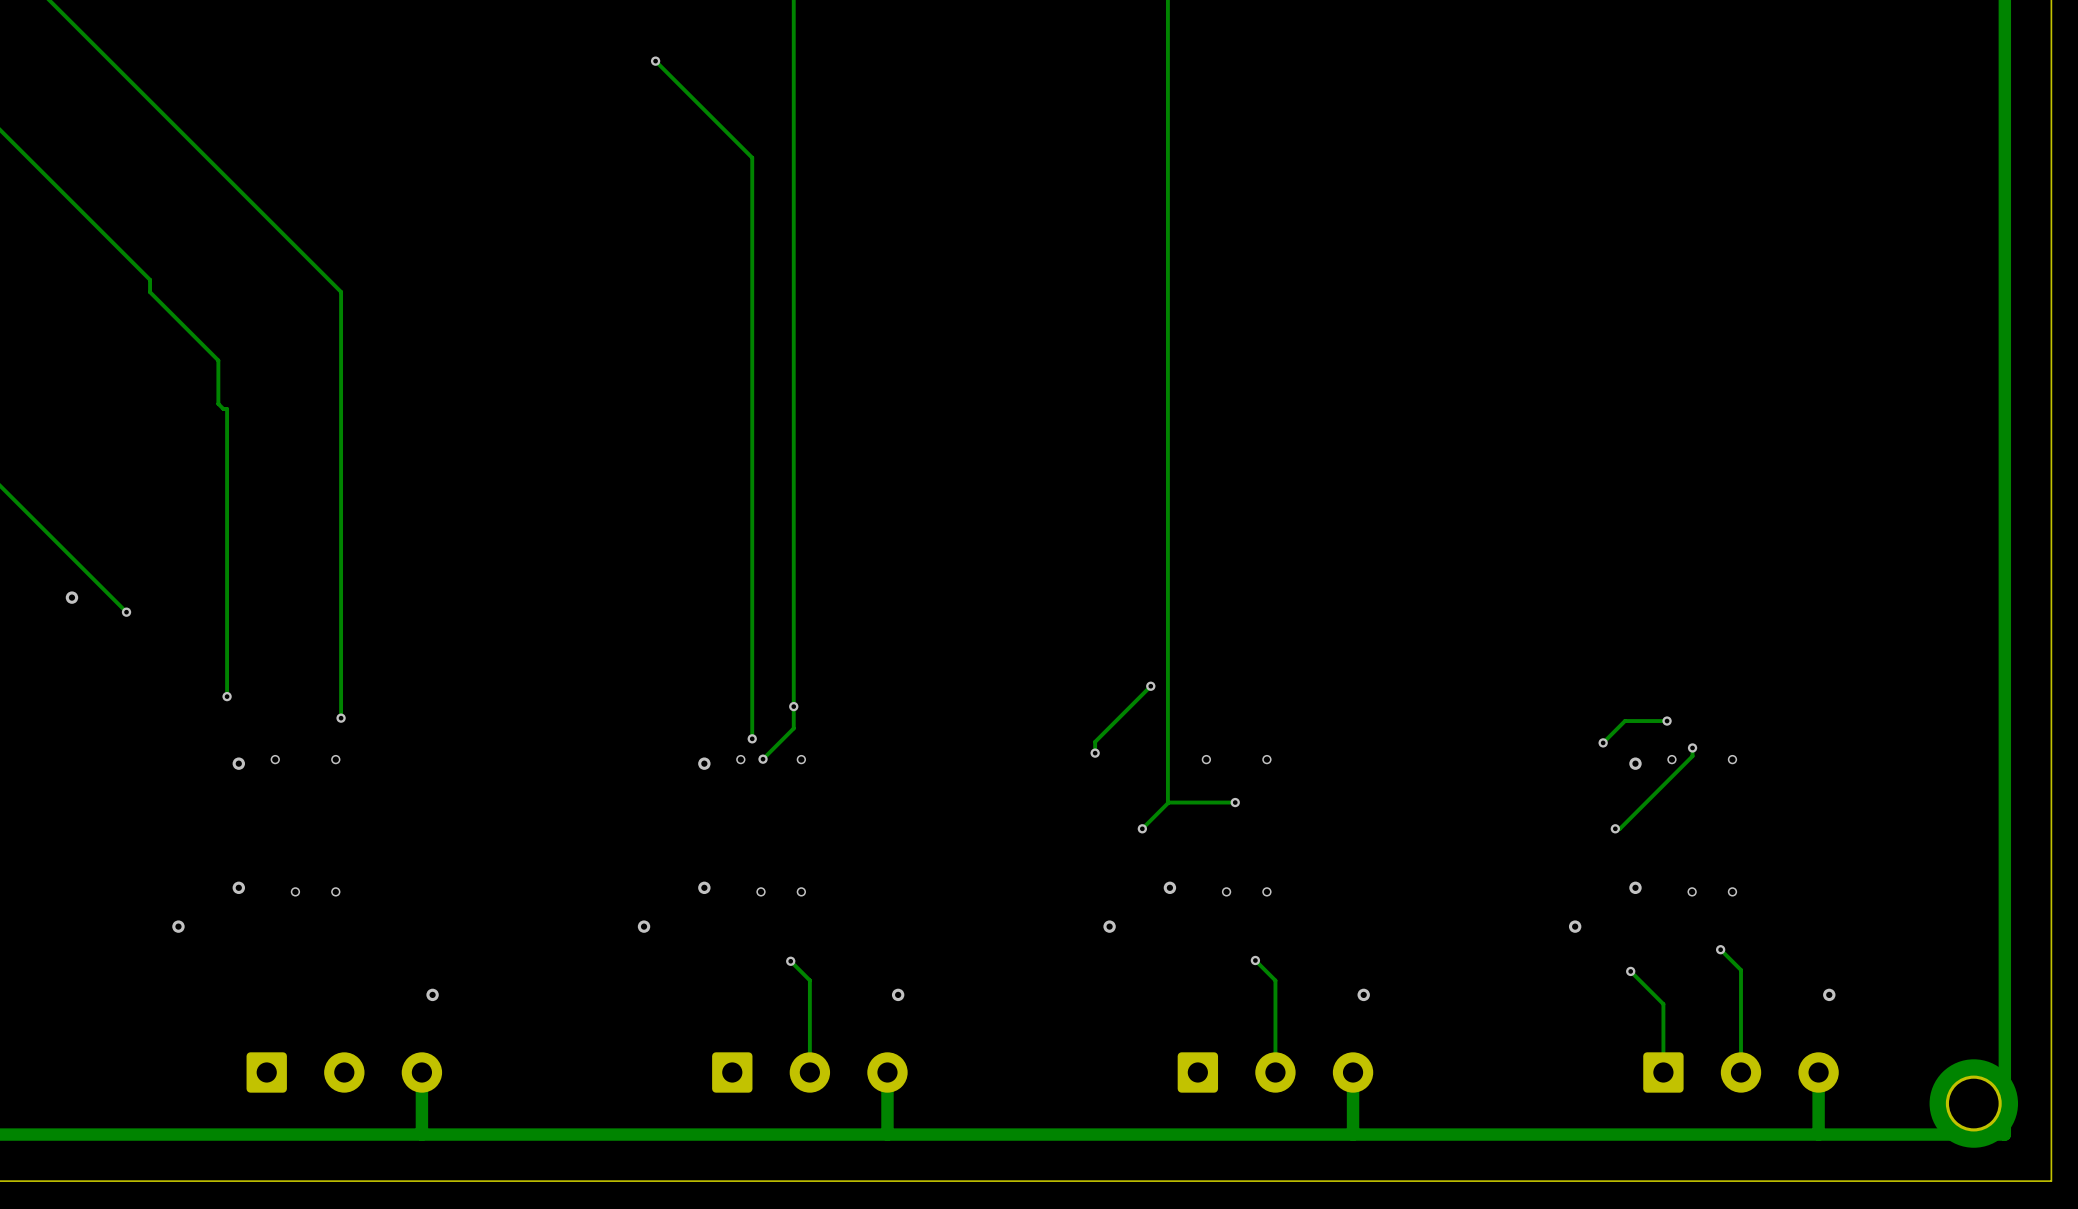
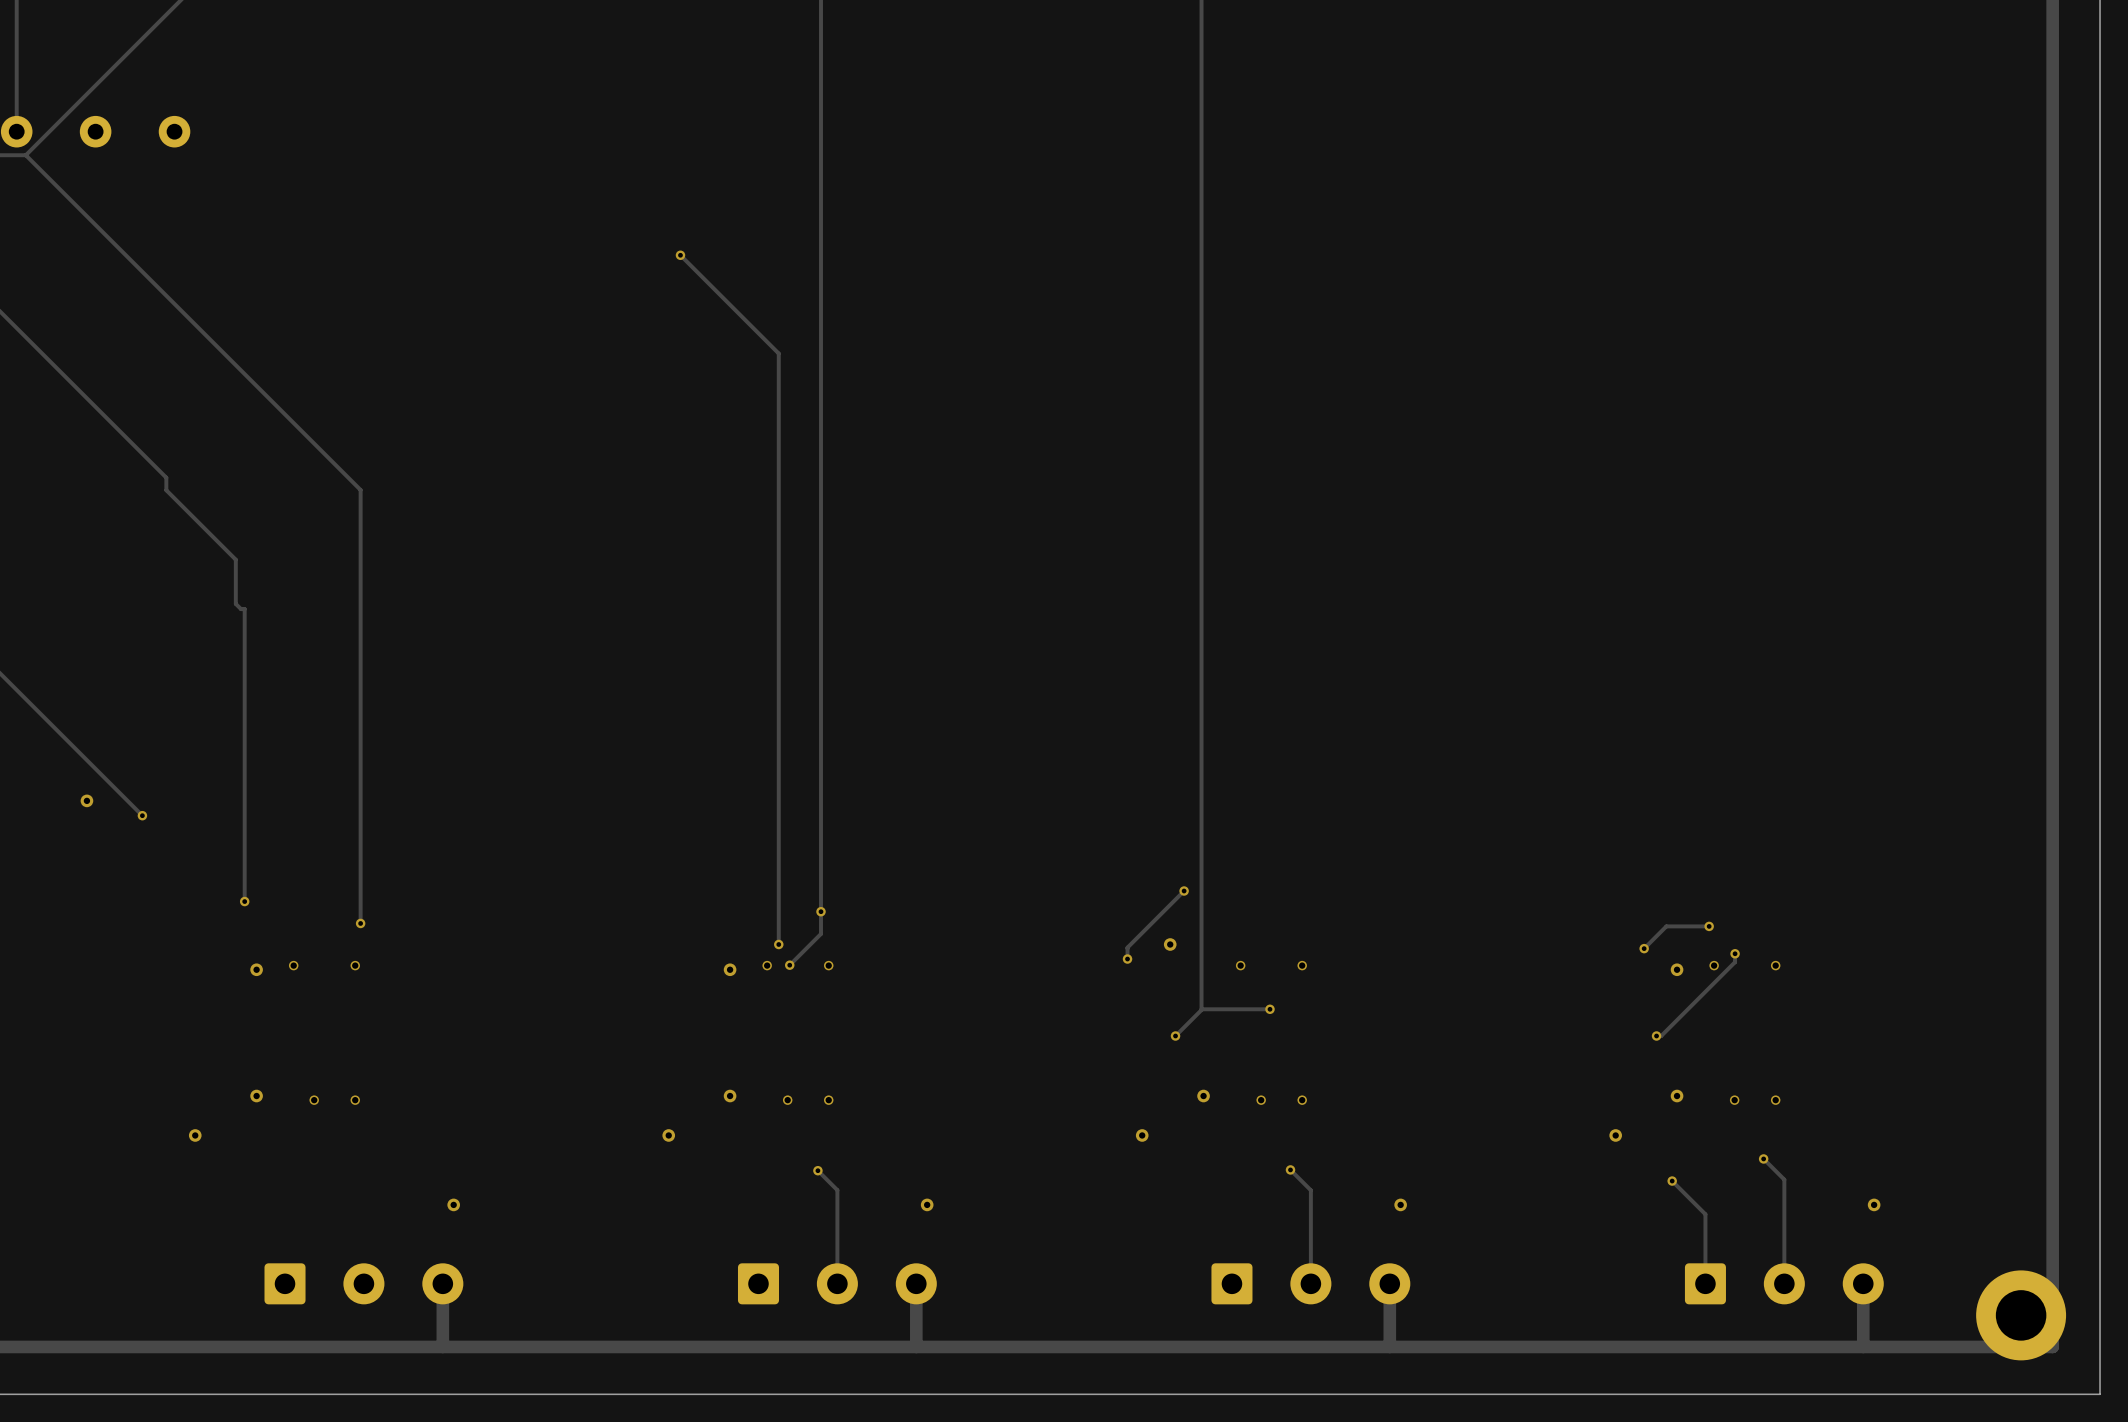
via: none -> (1170, 944)

